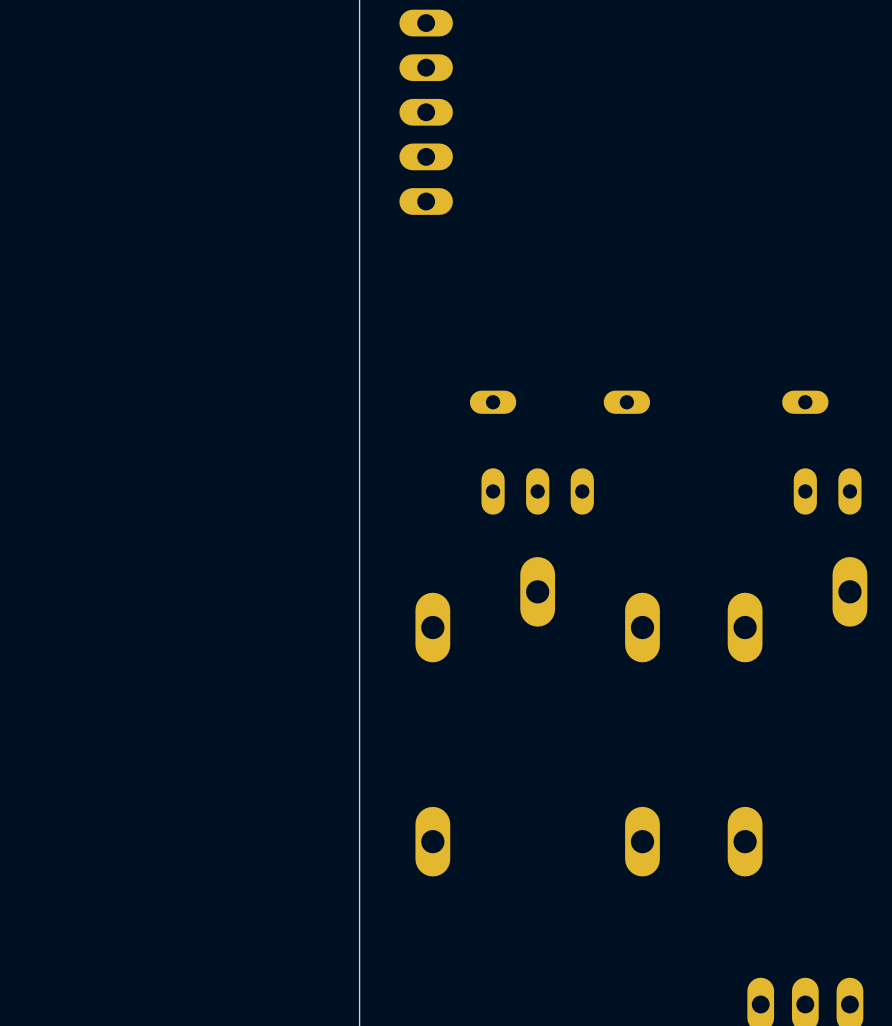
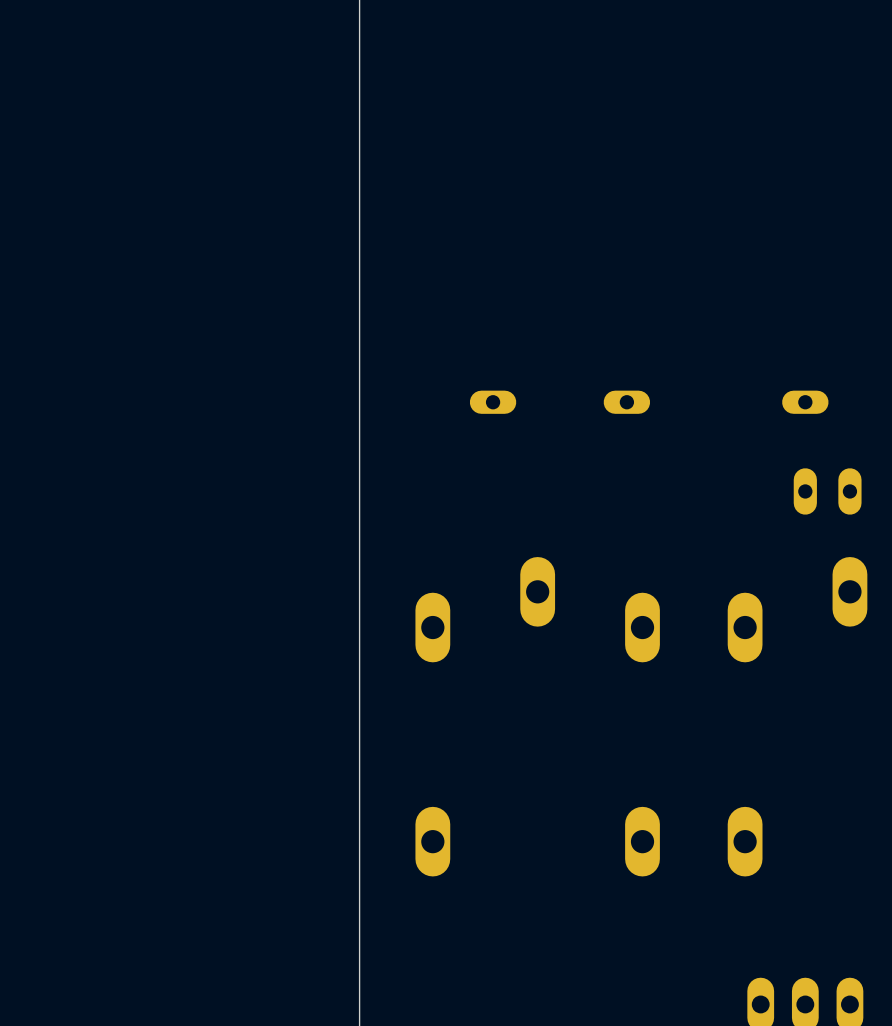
part: (426, 112) -> none
part: (537, 491) -> none

